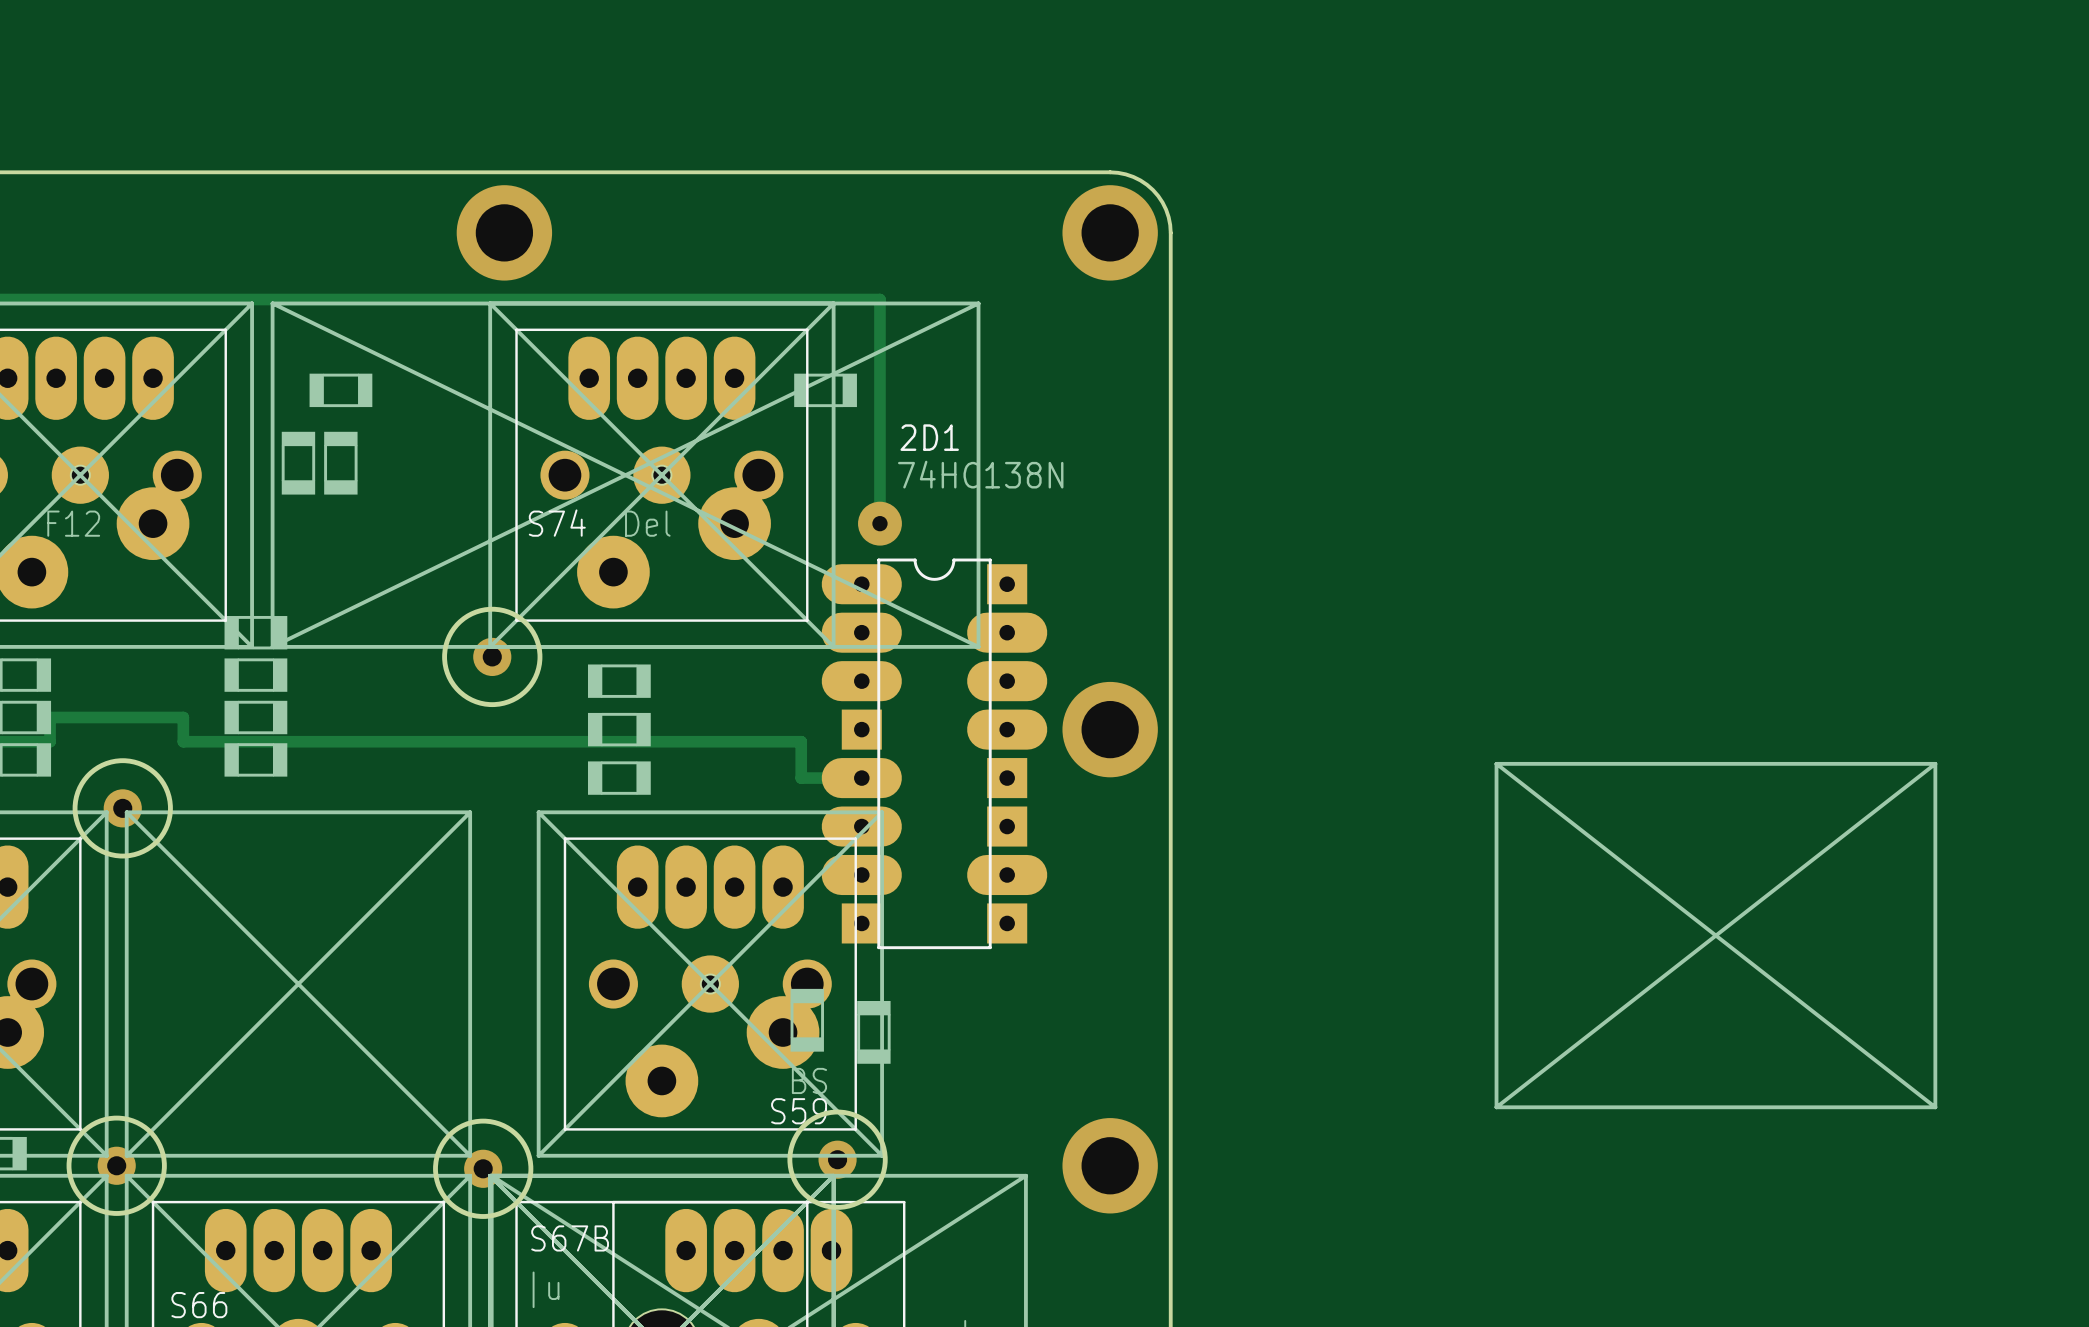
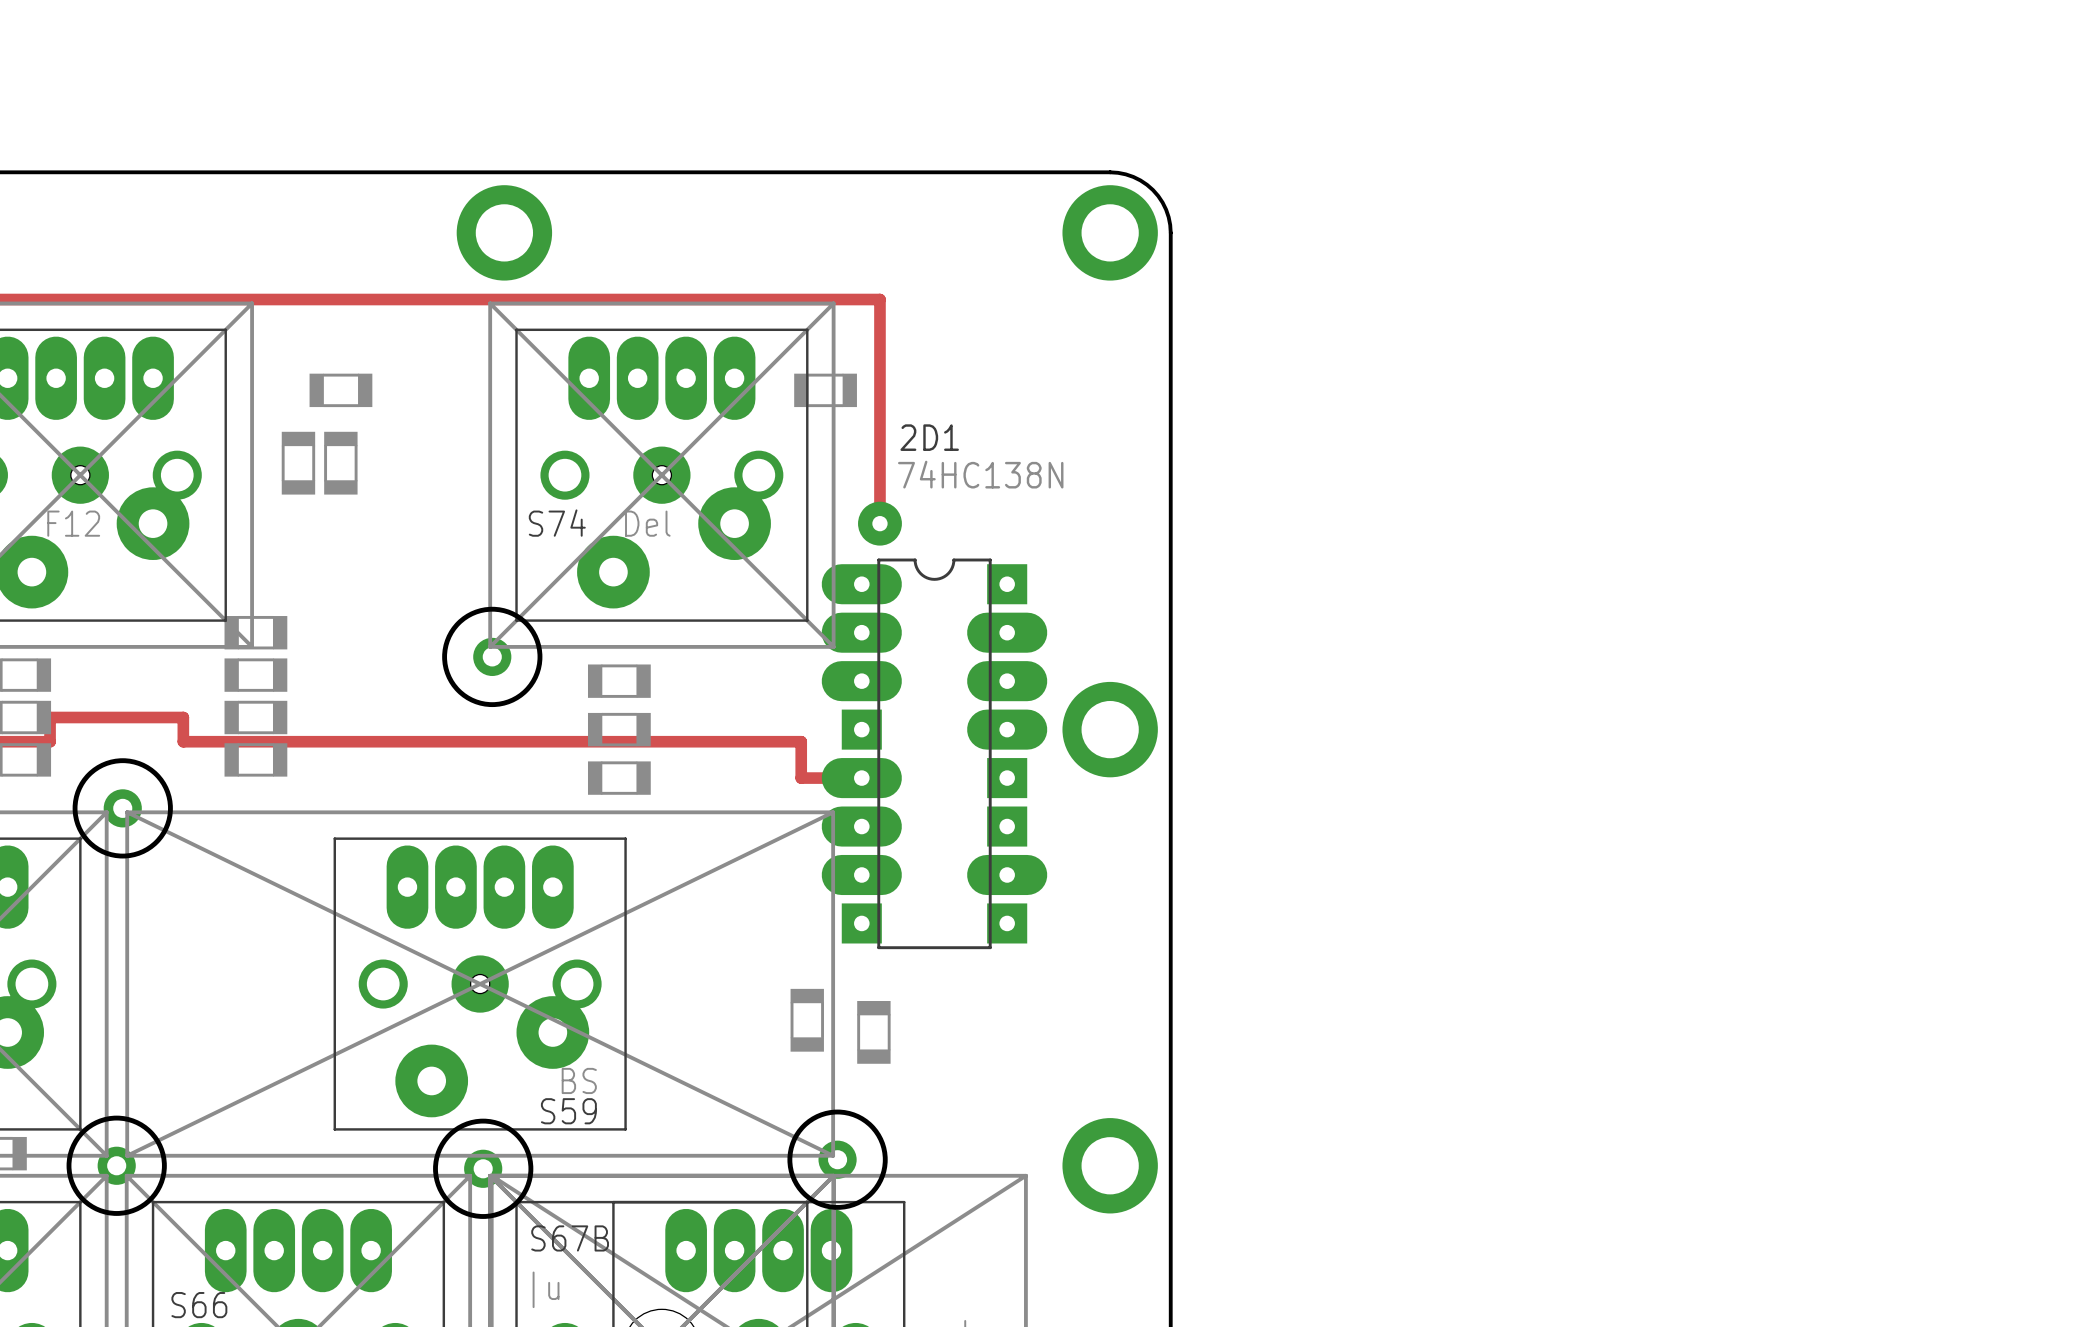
drawing: [270, 301, 981, 649] -> none
drawing: [1494, 761, 1938, 1110] -> none
drawing: [124, 810, 473, 1158] -> none
drawing: none -> [125, 810, 836, 1158]
drawing: [536, 810, 884, 1158] -> none
S59 position: (710, 984) -> (480, 984)

